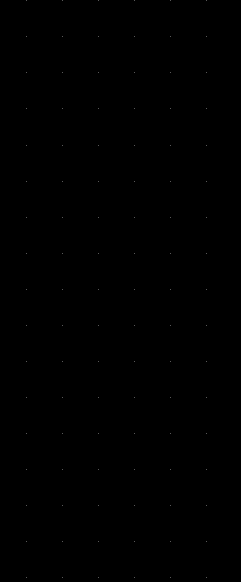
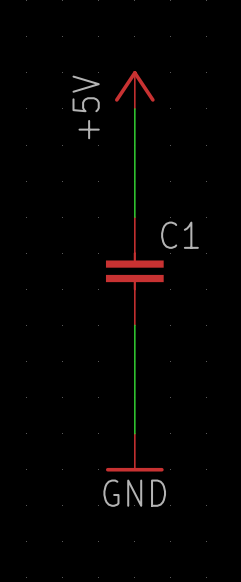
power symbol: none -> +5V (134, 90)
wire: none -> (134, 108) (134, 217)
C1: none -> (134, 271)
wire: none -> (134, 325) (134, 433)
power symbol: none -> GND (134, 452)

